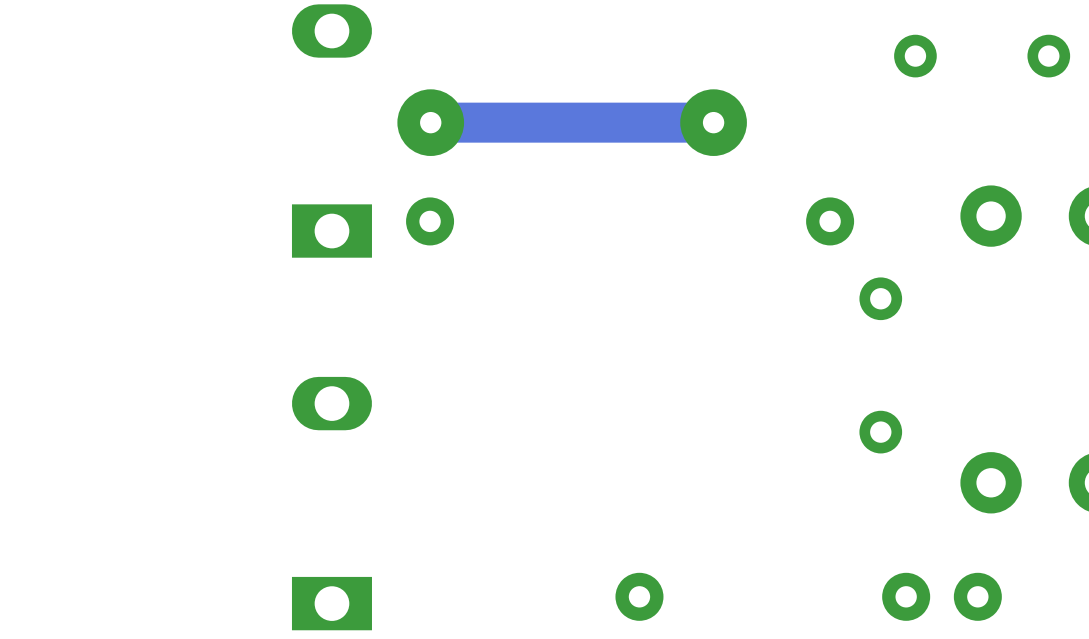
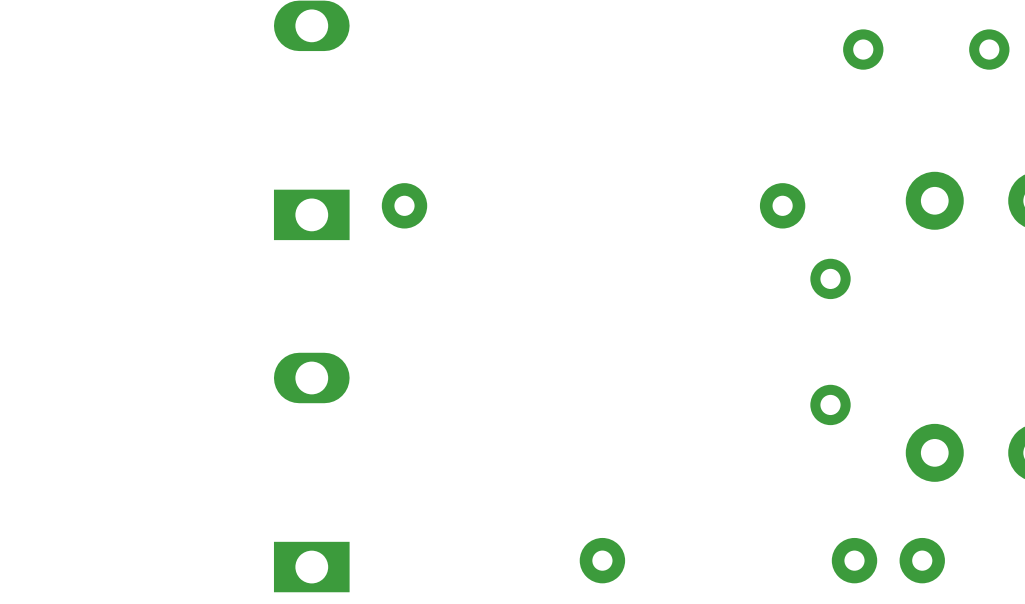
via: (430, 122) -> none
track: (713, 122) (430, 122) -> none
via: (713, 122) -> none

